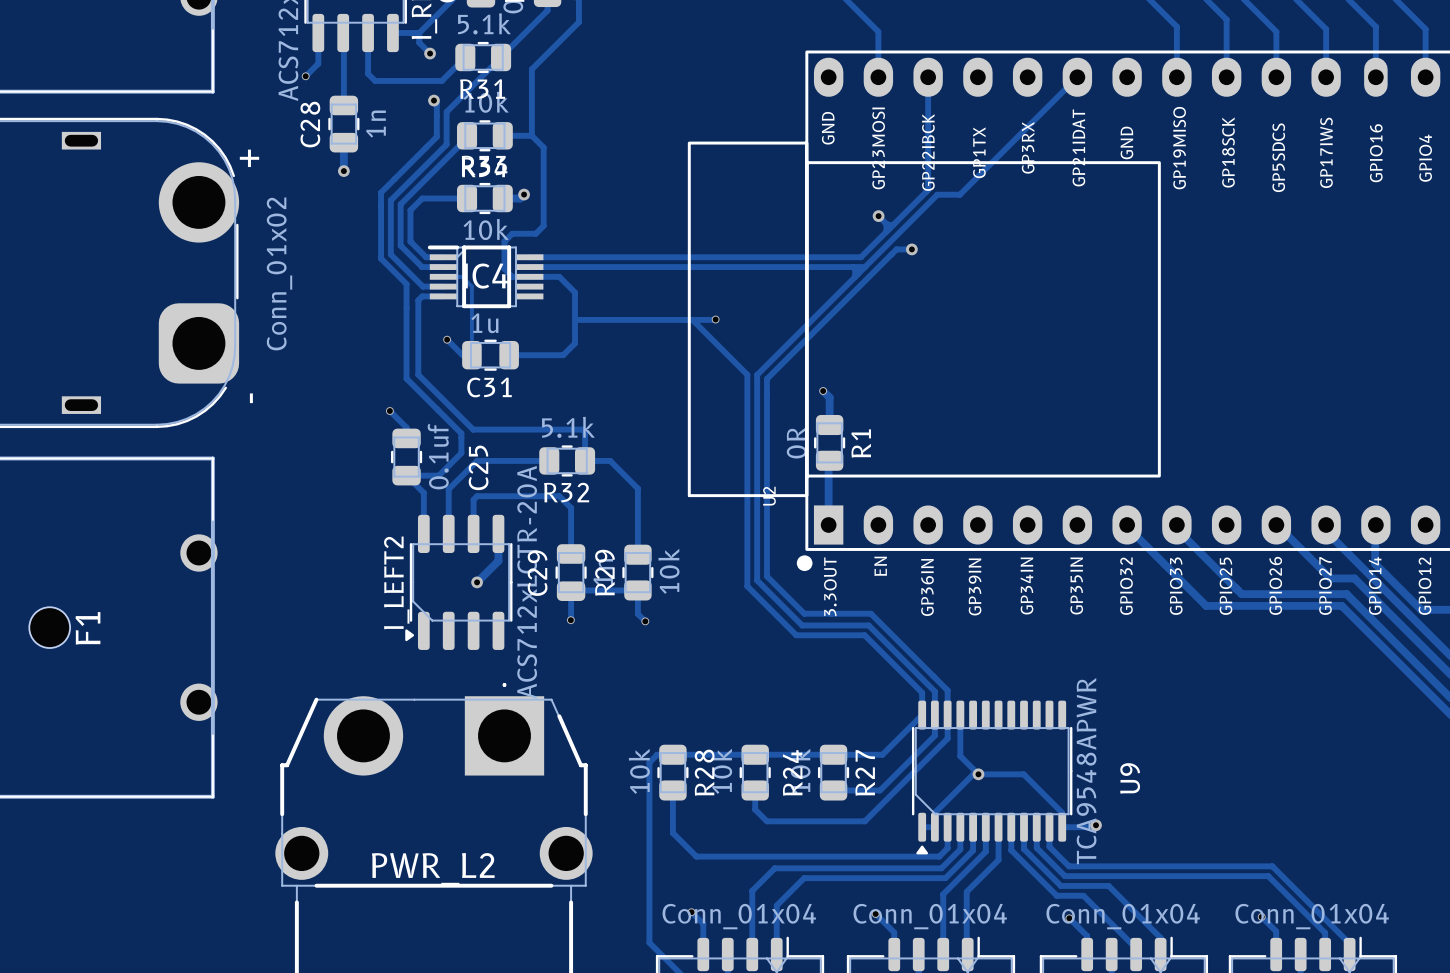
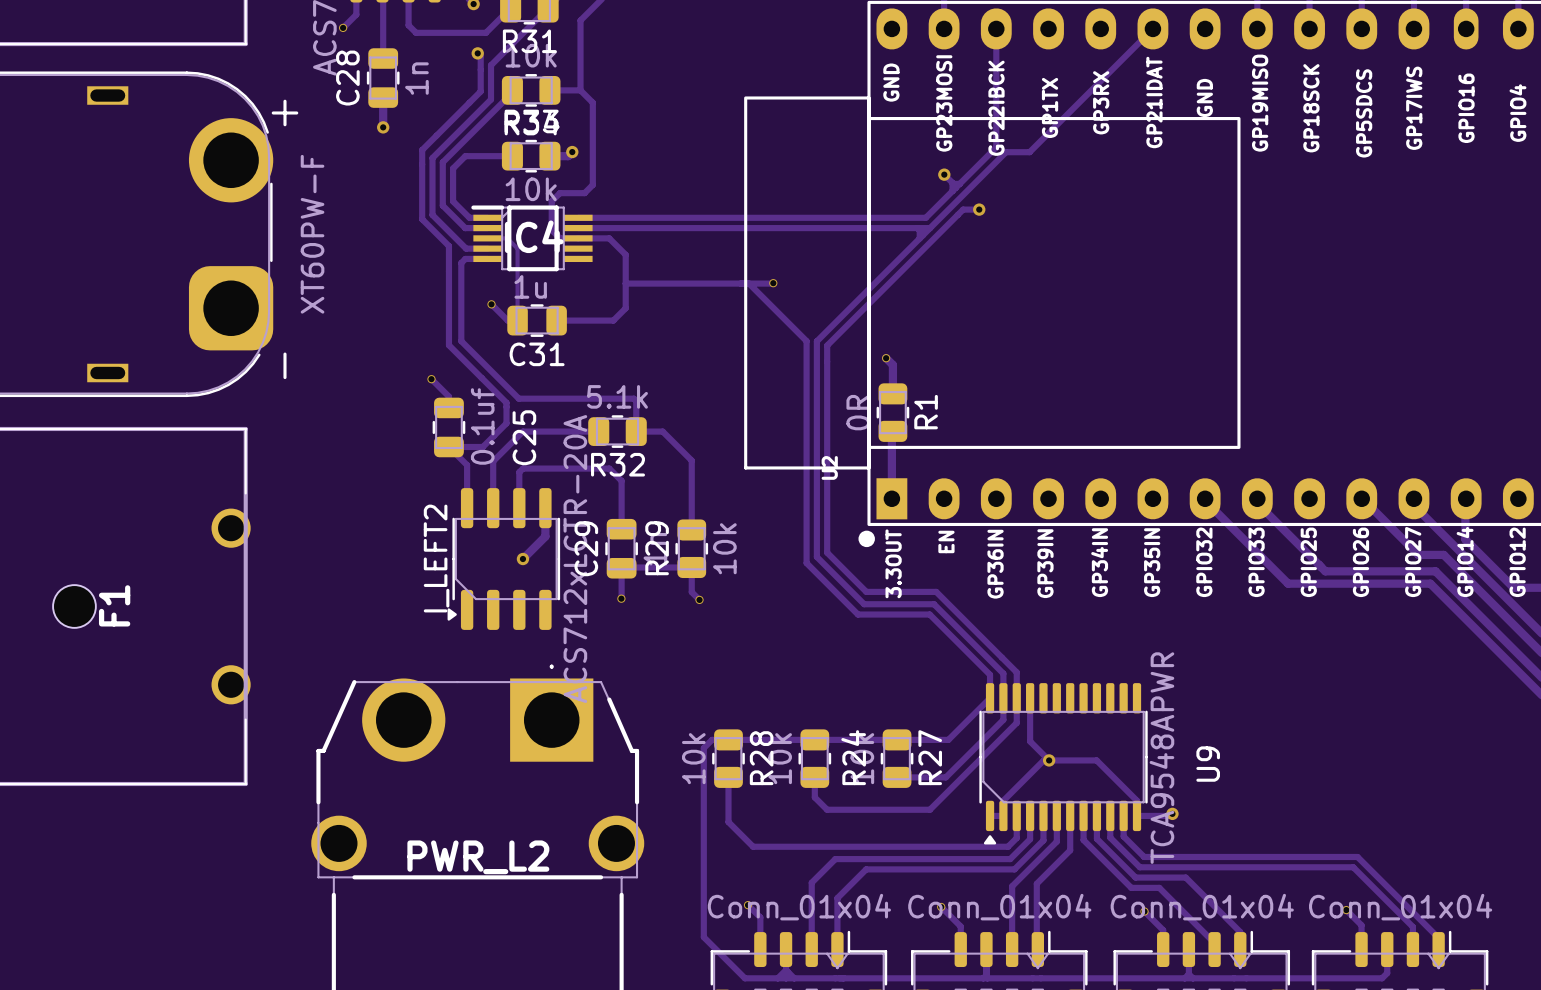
part value: Conn_01x02 (279, 273) -> XT60PW-F (312, 234)

